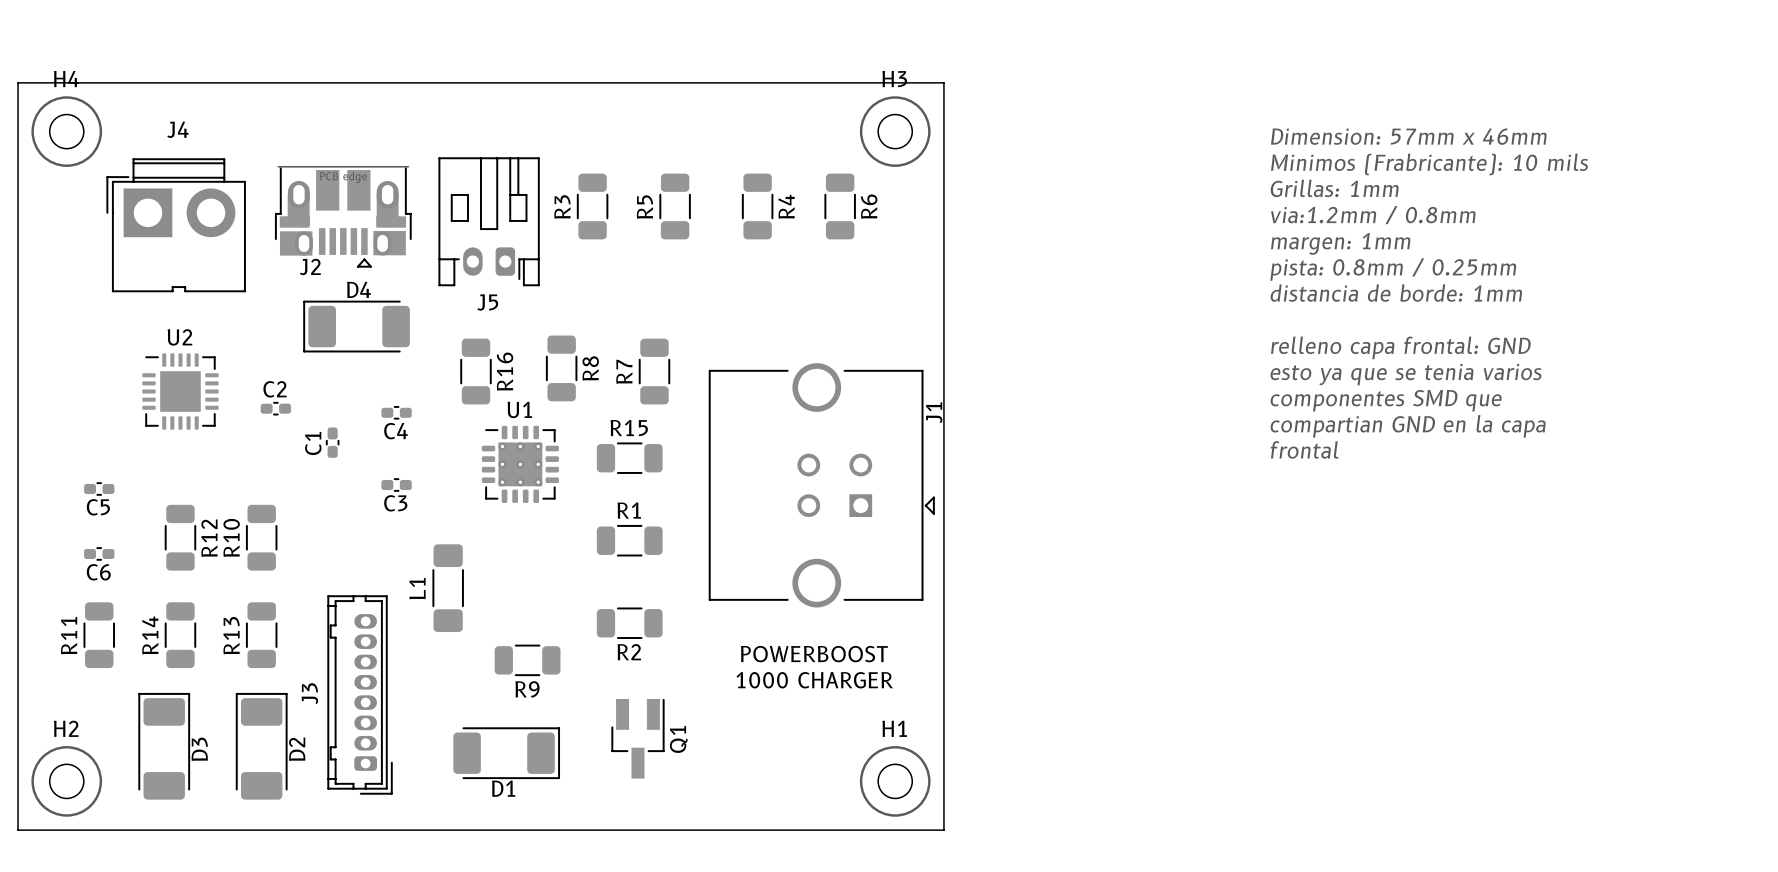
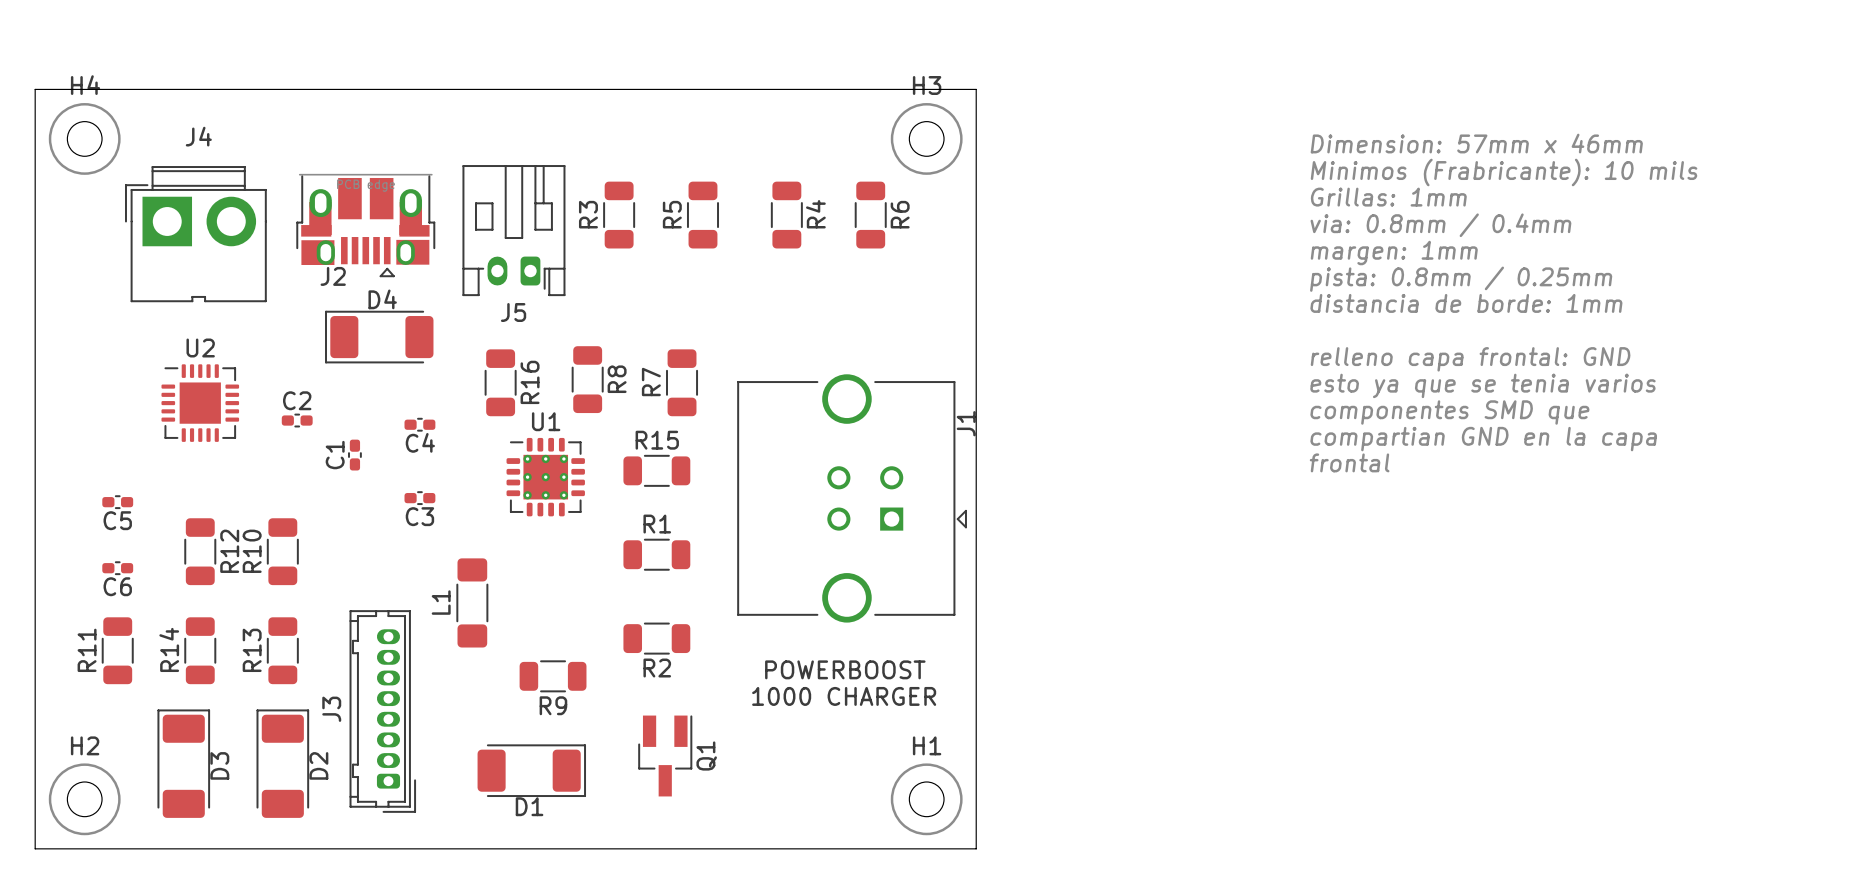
text: via:1.2mm / 0.8mm (1373, 215) -> via: 0.8mm / 0.4mm (1440, 225)

